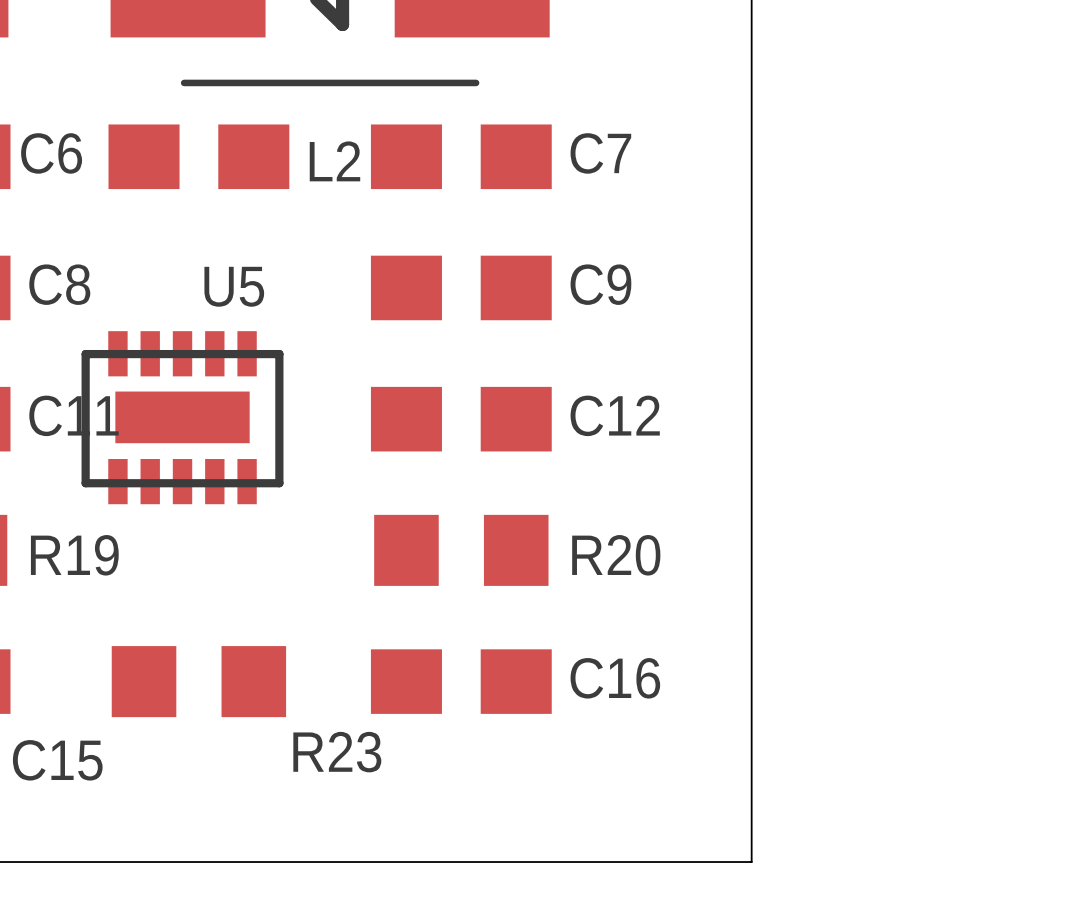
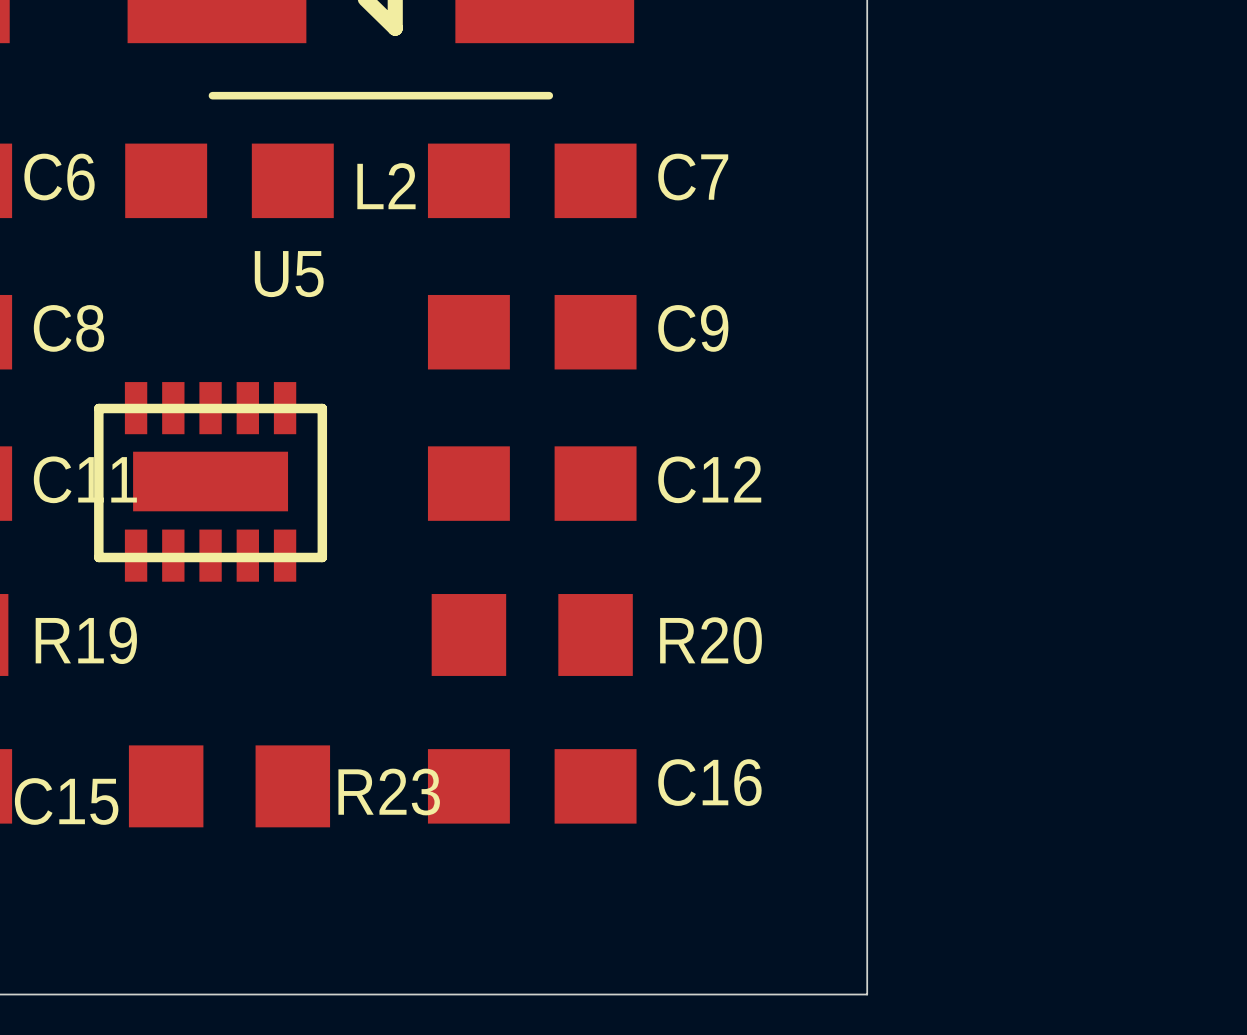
U5 name position: U5 (234, 286) -> U5 (289, 274)
R23 name position: R23 (337, 752) -> R23 (389, 792)
C15 name position: C15 (57, 760) -> C15 (66, 801)

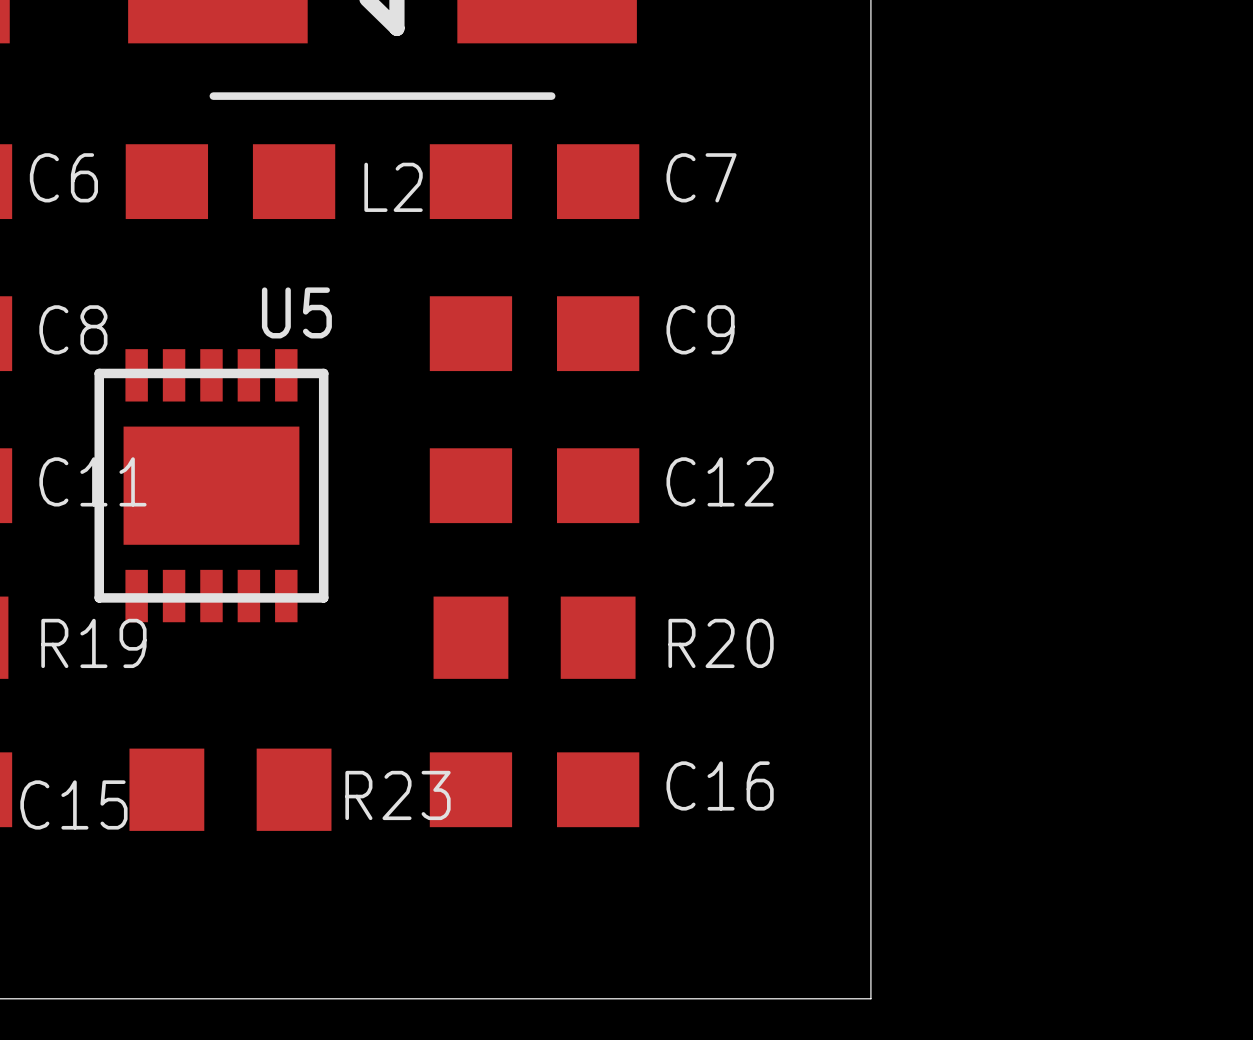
U5 name position: U5 (289, 274) -> U5 (296, 312)
U5 footprint: [94, 382, 328, 582] -> [94, 349, 329, 623]

